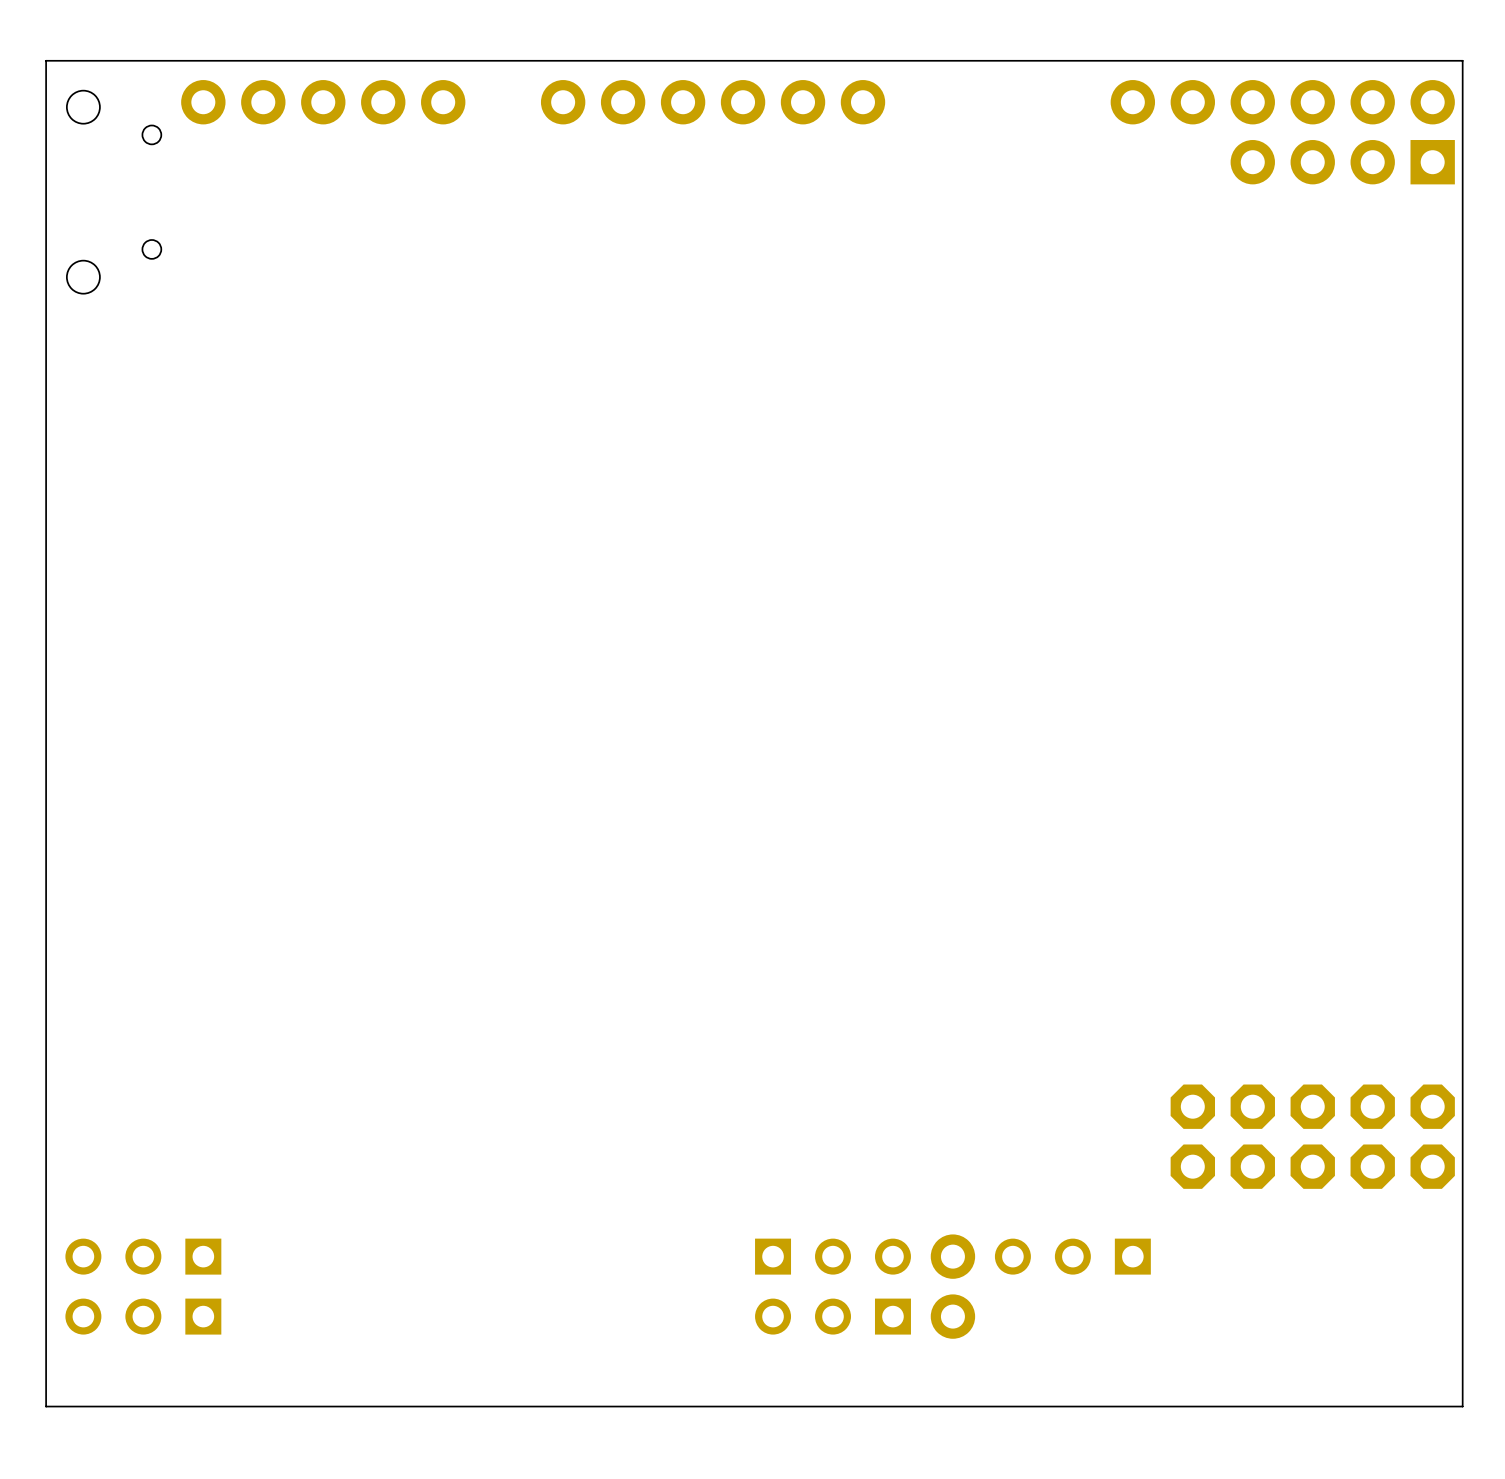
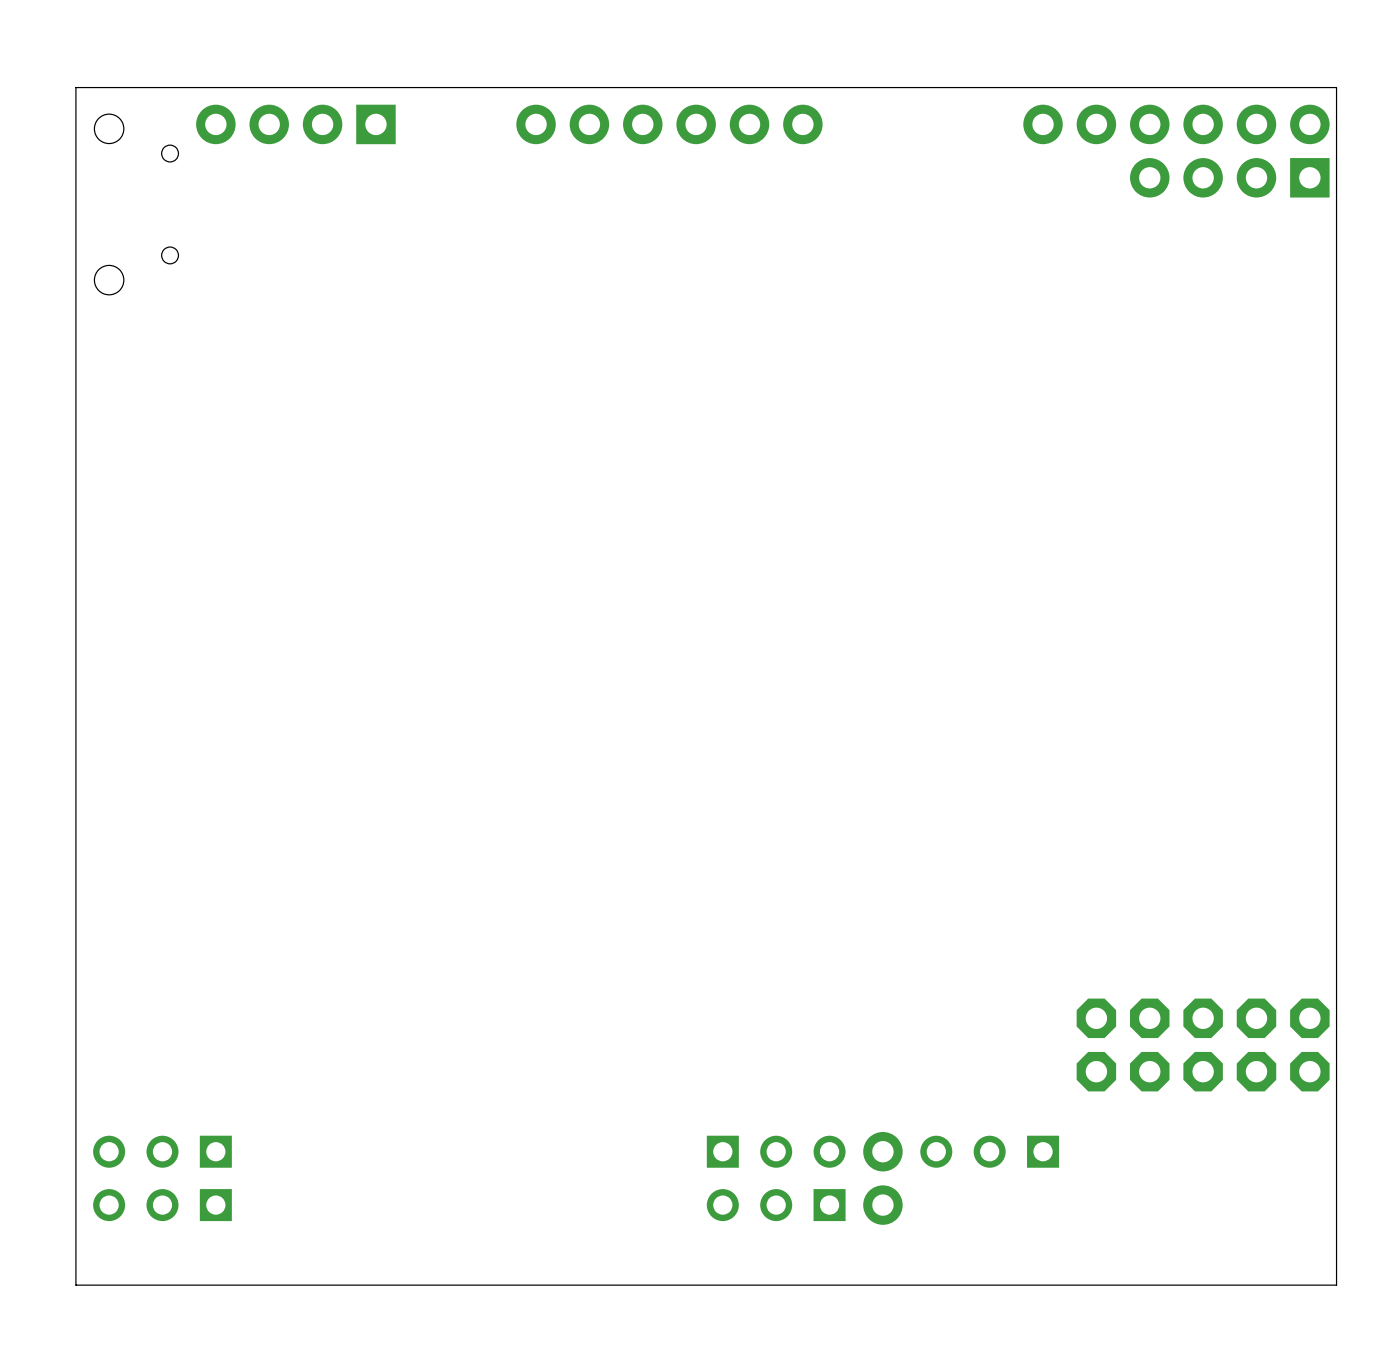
part: none -> (295, 124)
part: (323, 102) -> none

